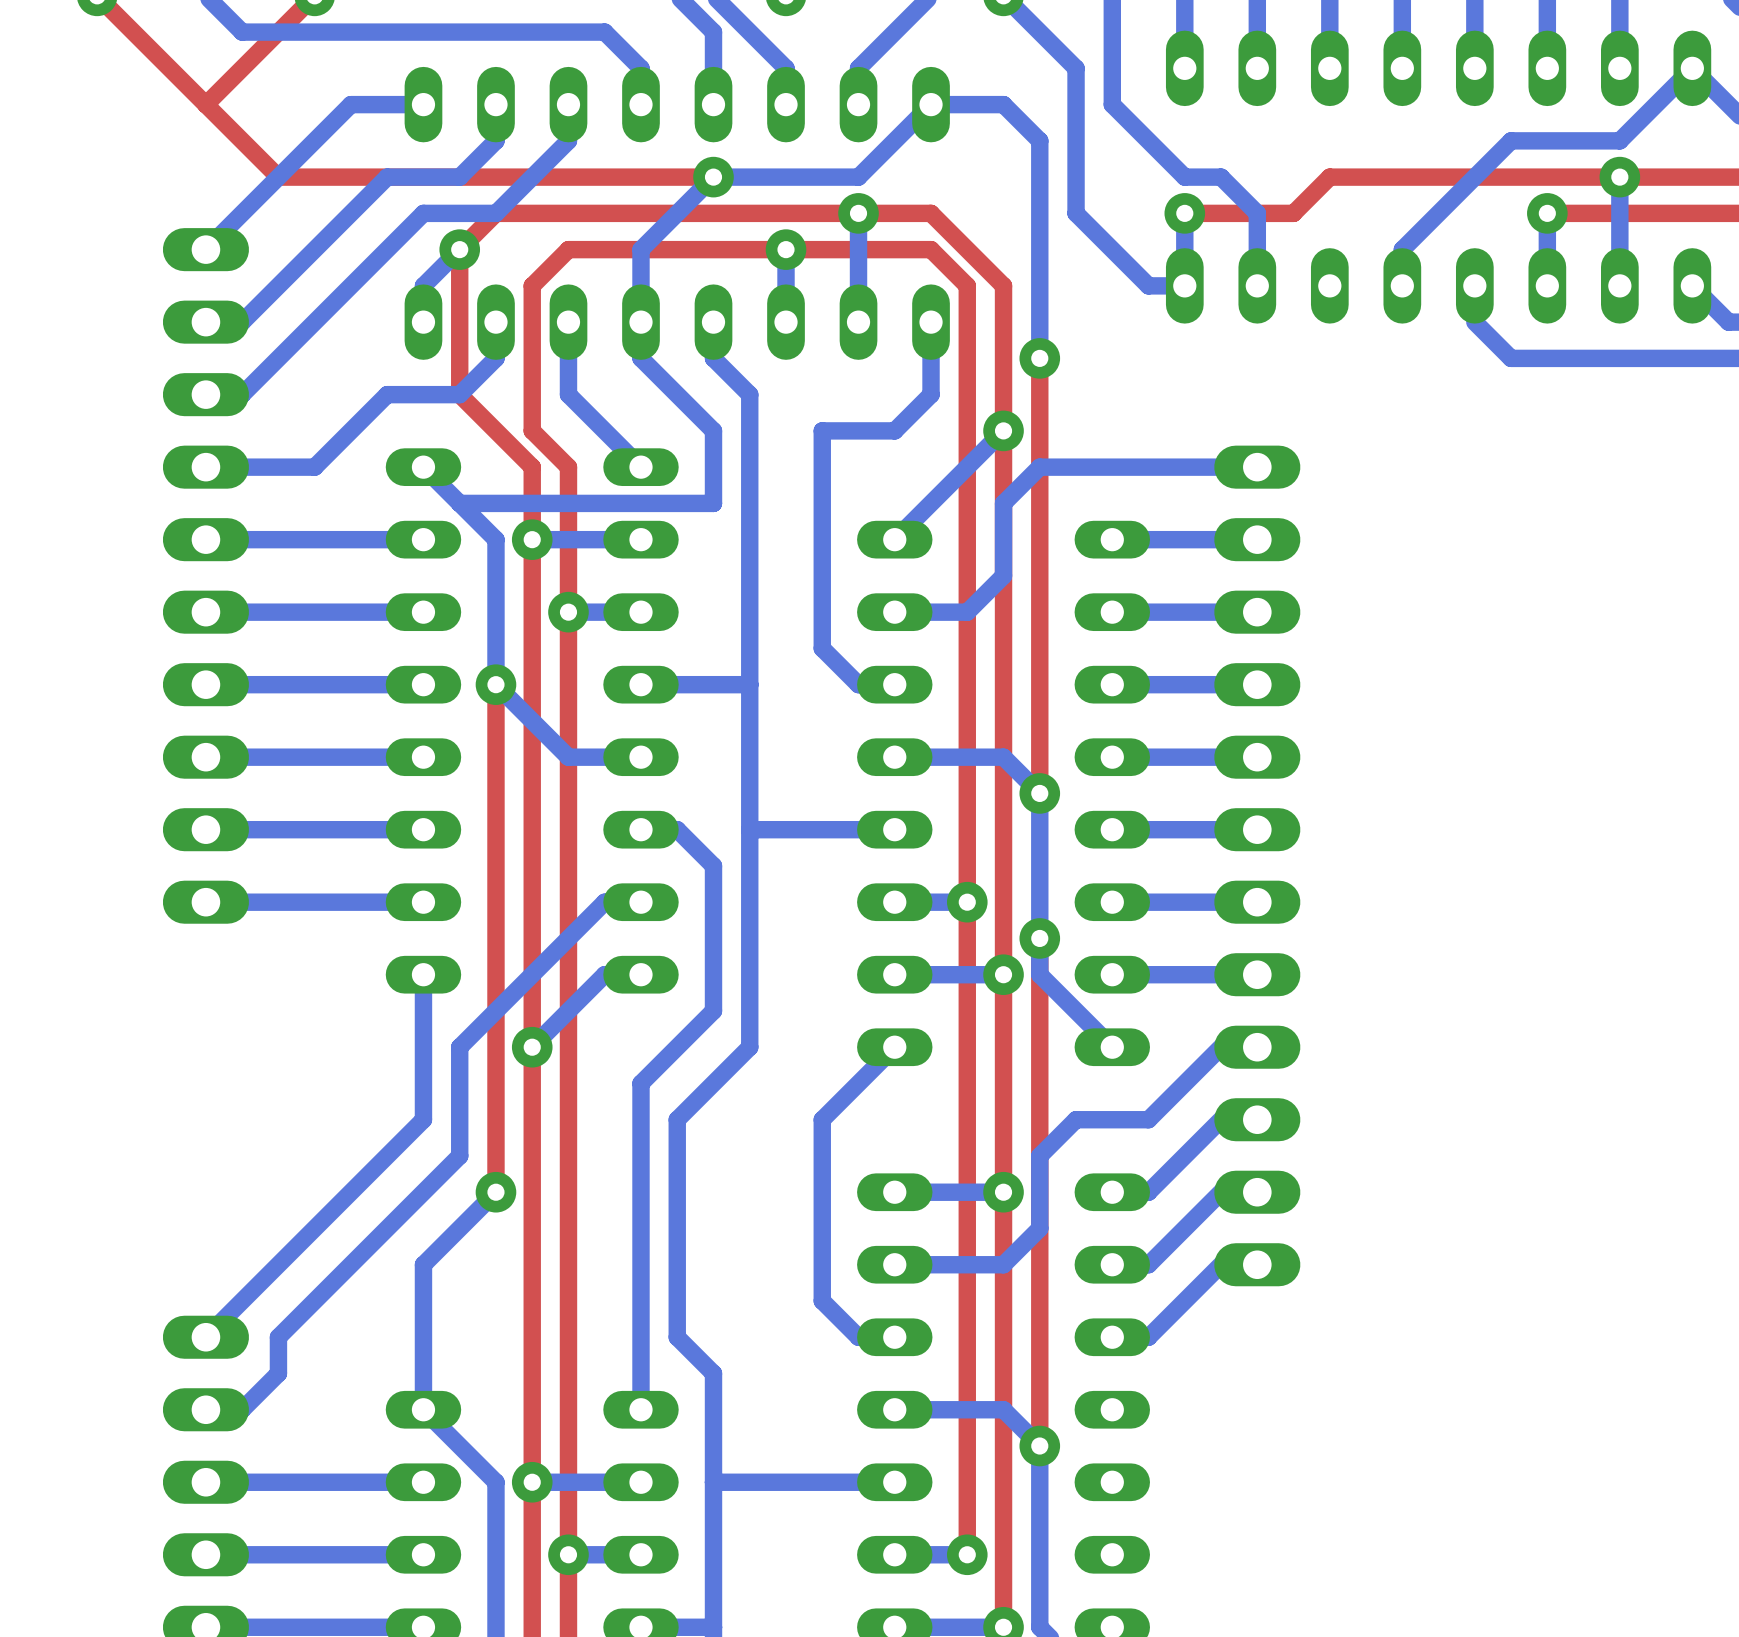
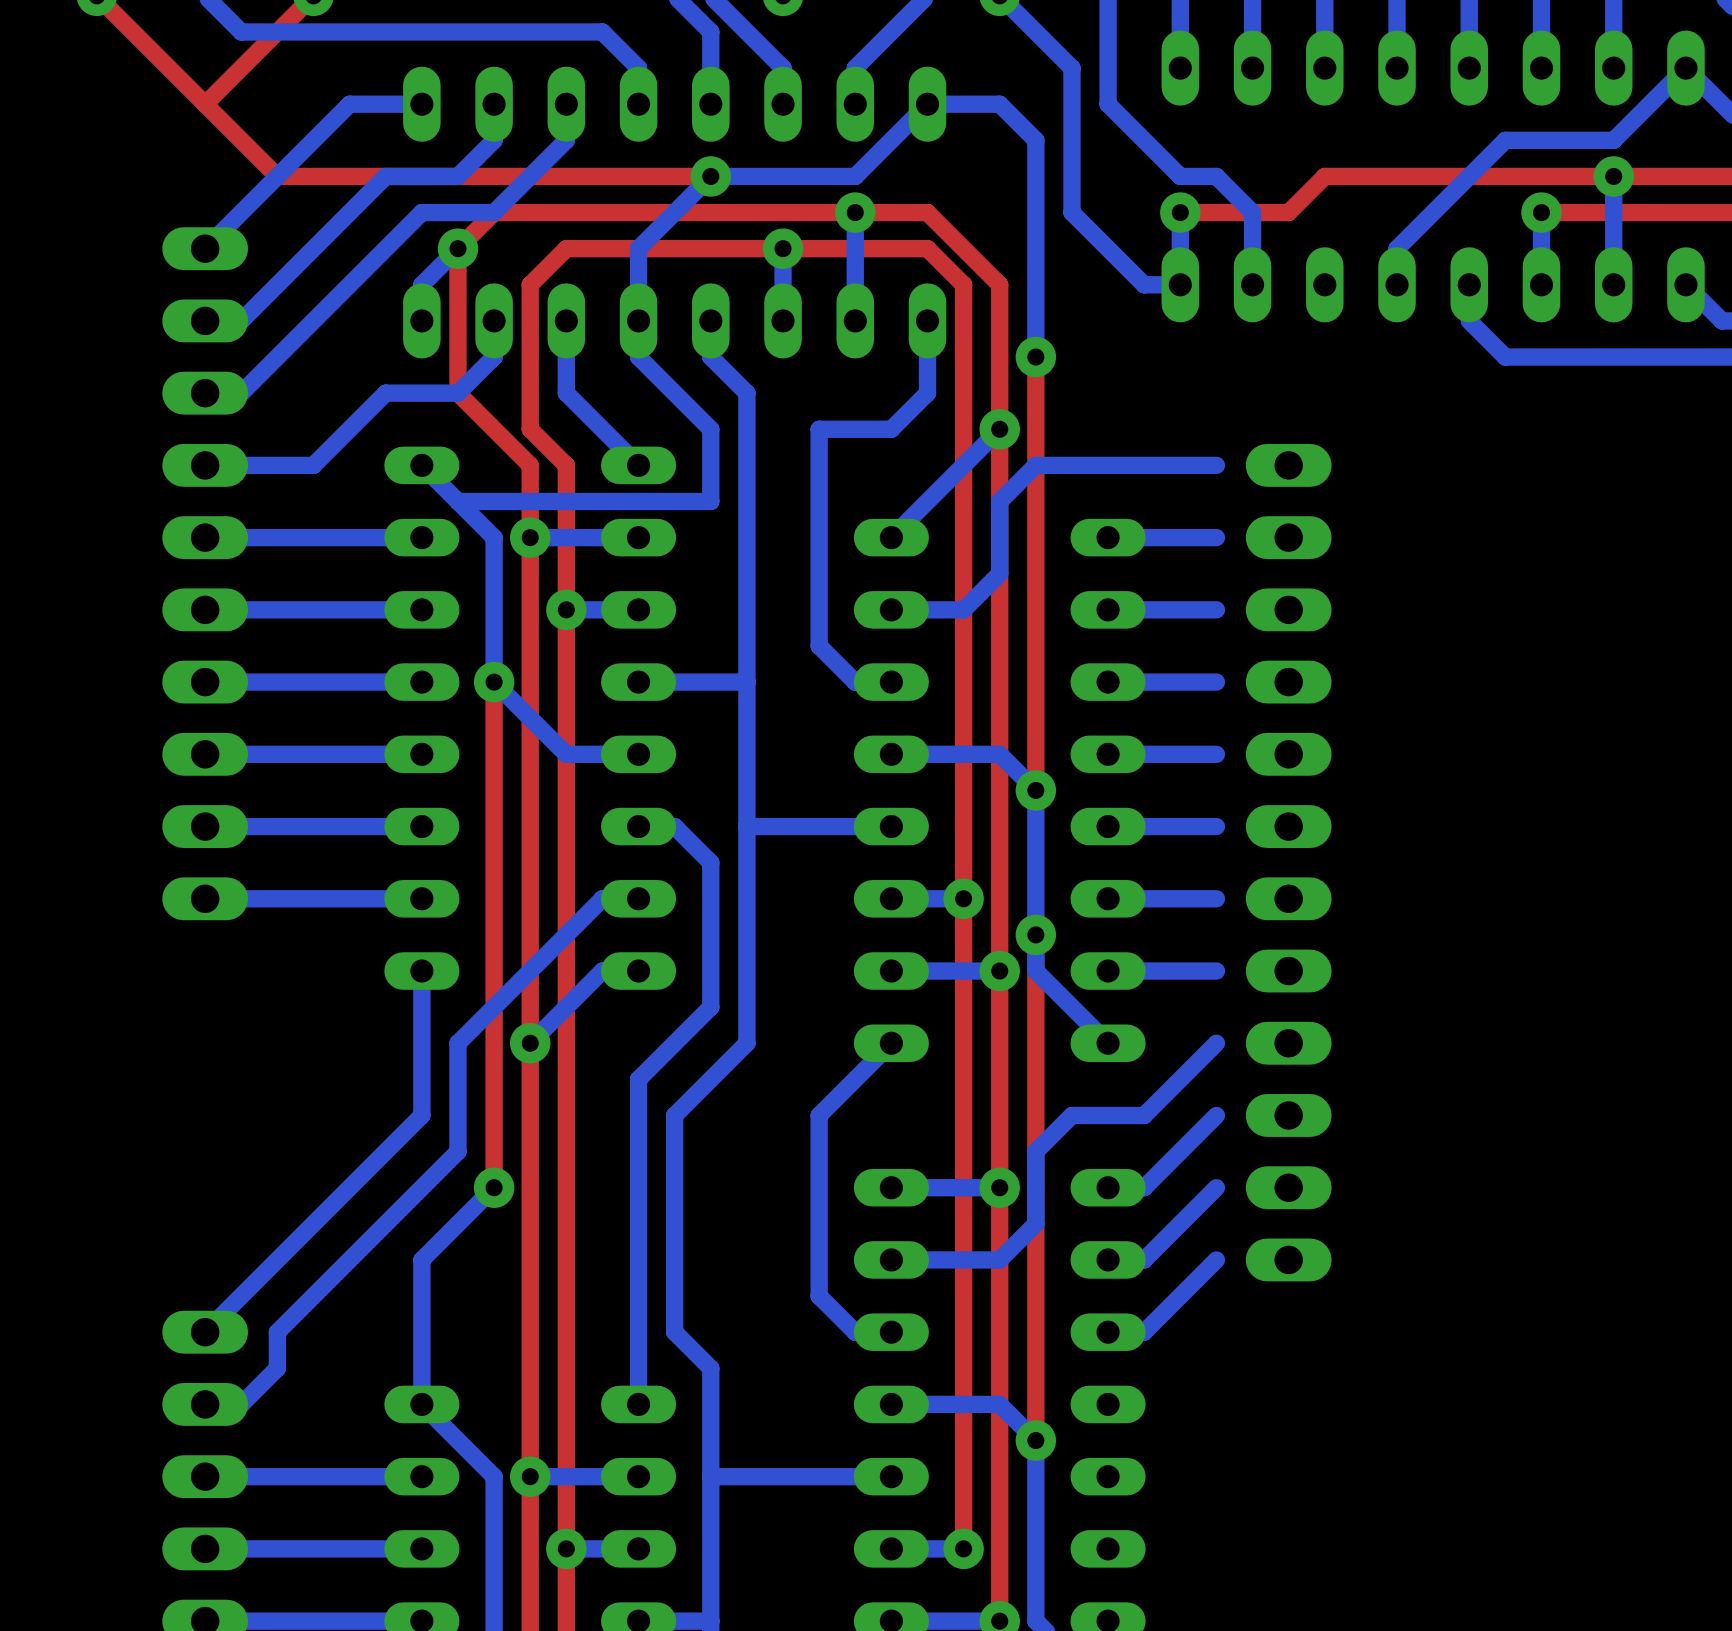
part position: (1257, 865) -> (1288, 862)

